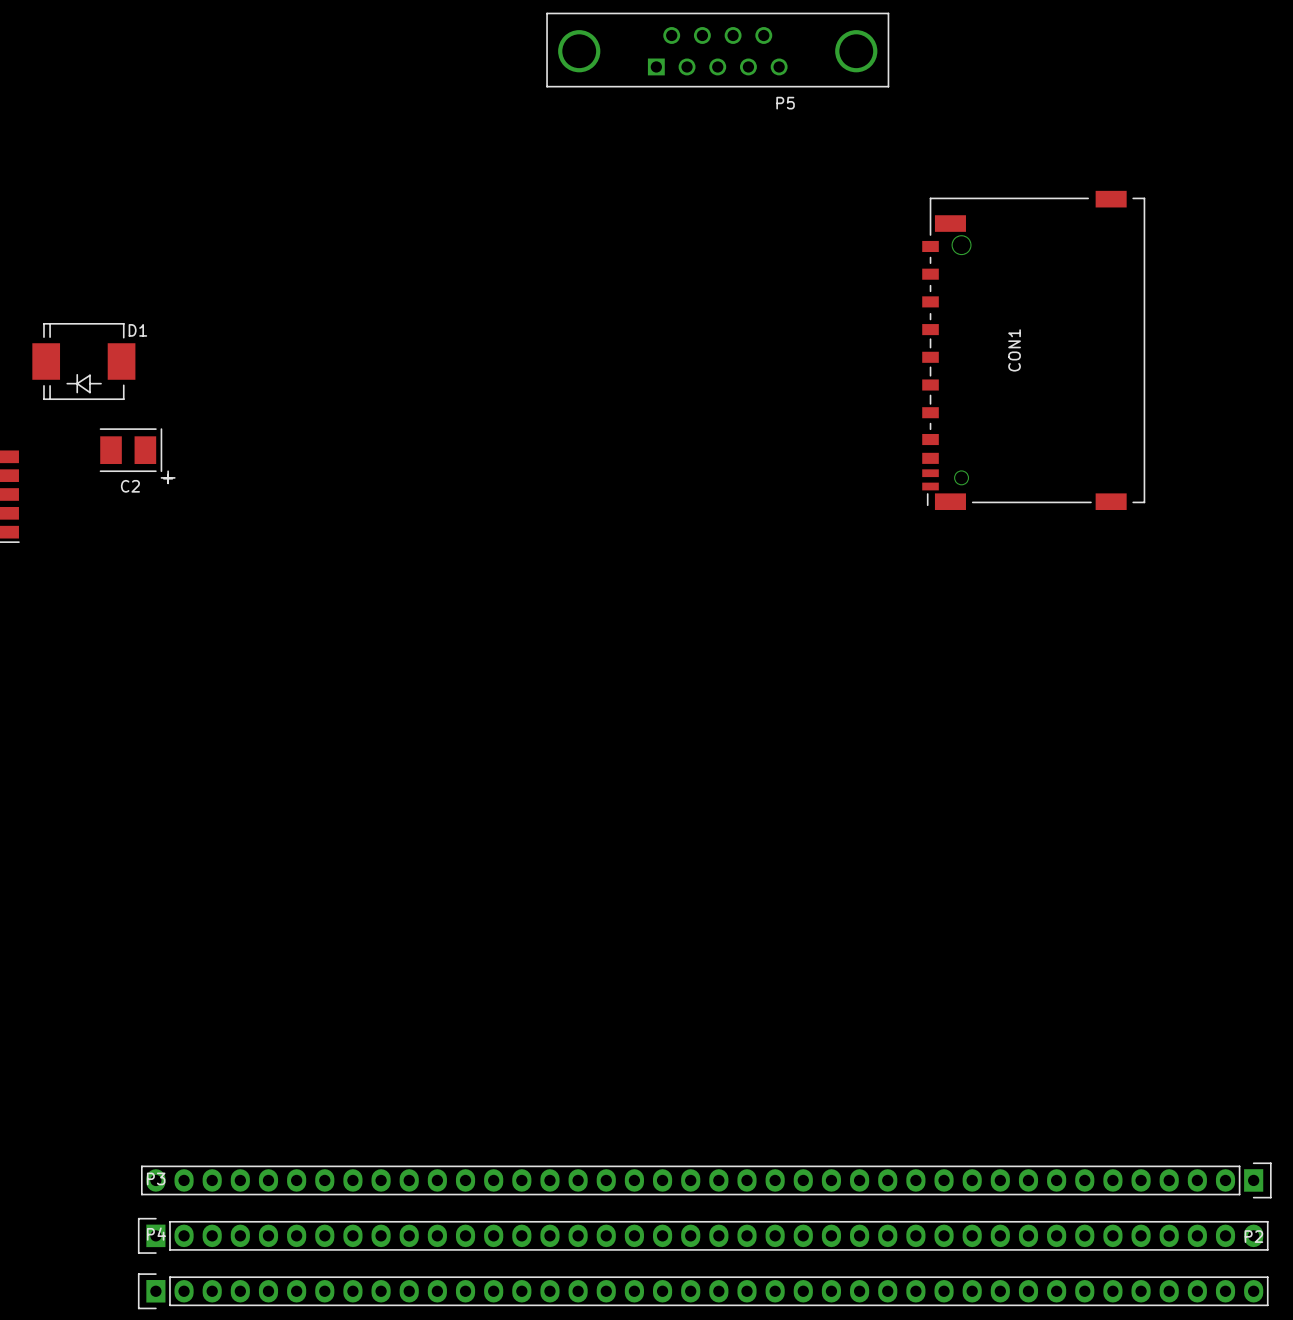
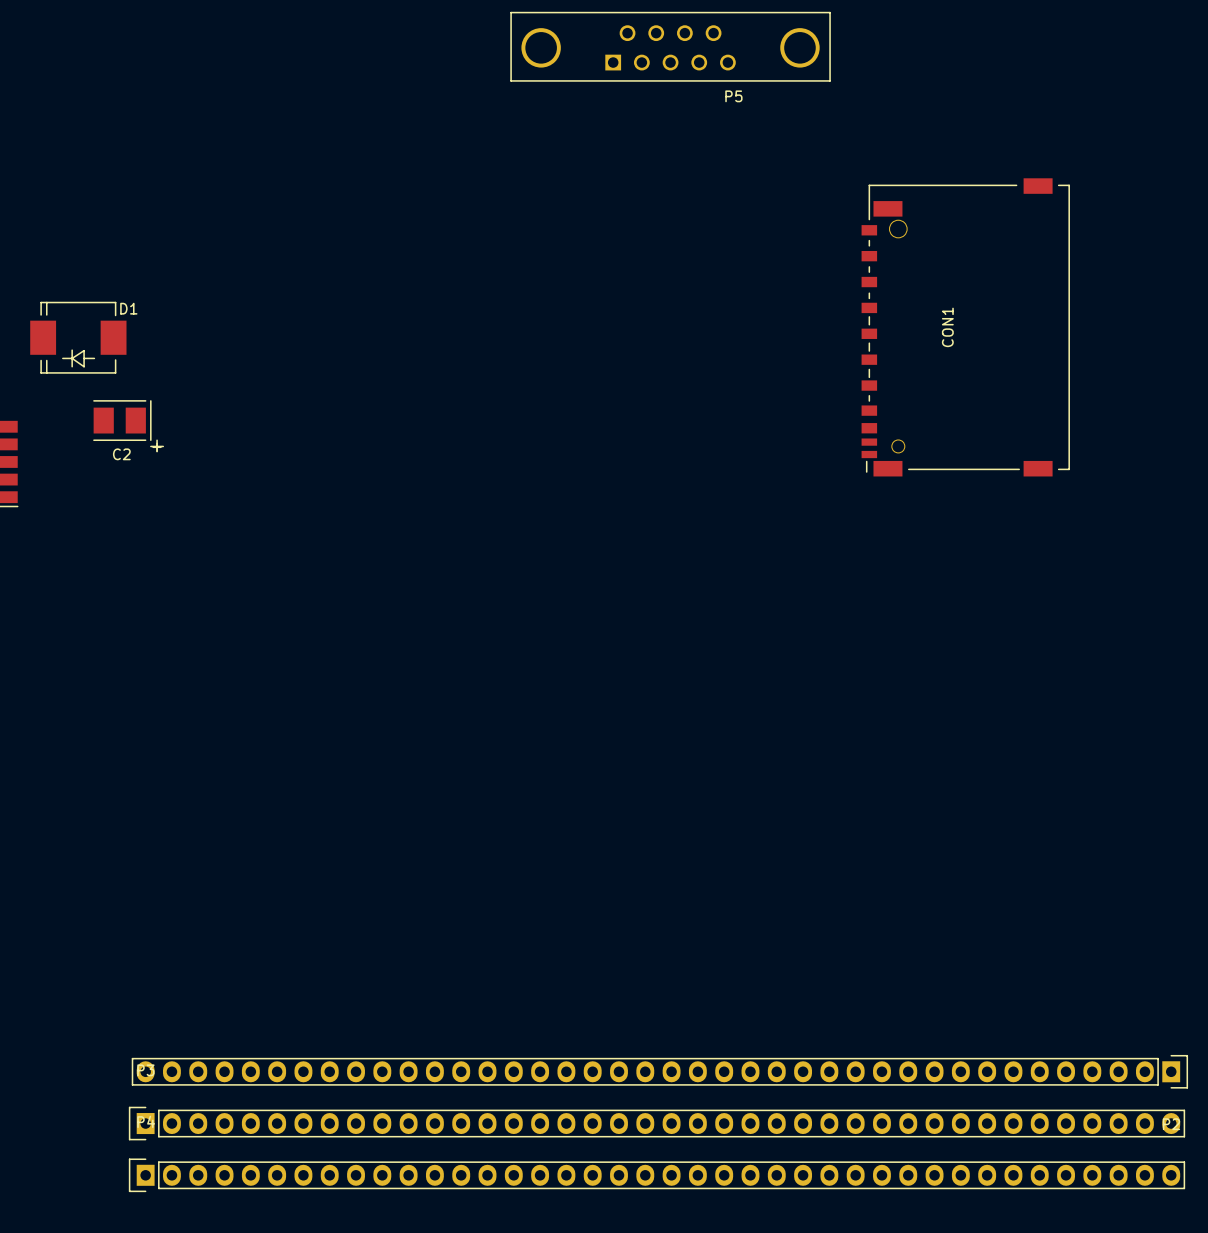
P2 position: (706, 1180) -> (659, 1071)
P3 position: (703, 1235) -> (656, 1123)
P4 position: (703, 1291) -> (656, 1175)

